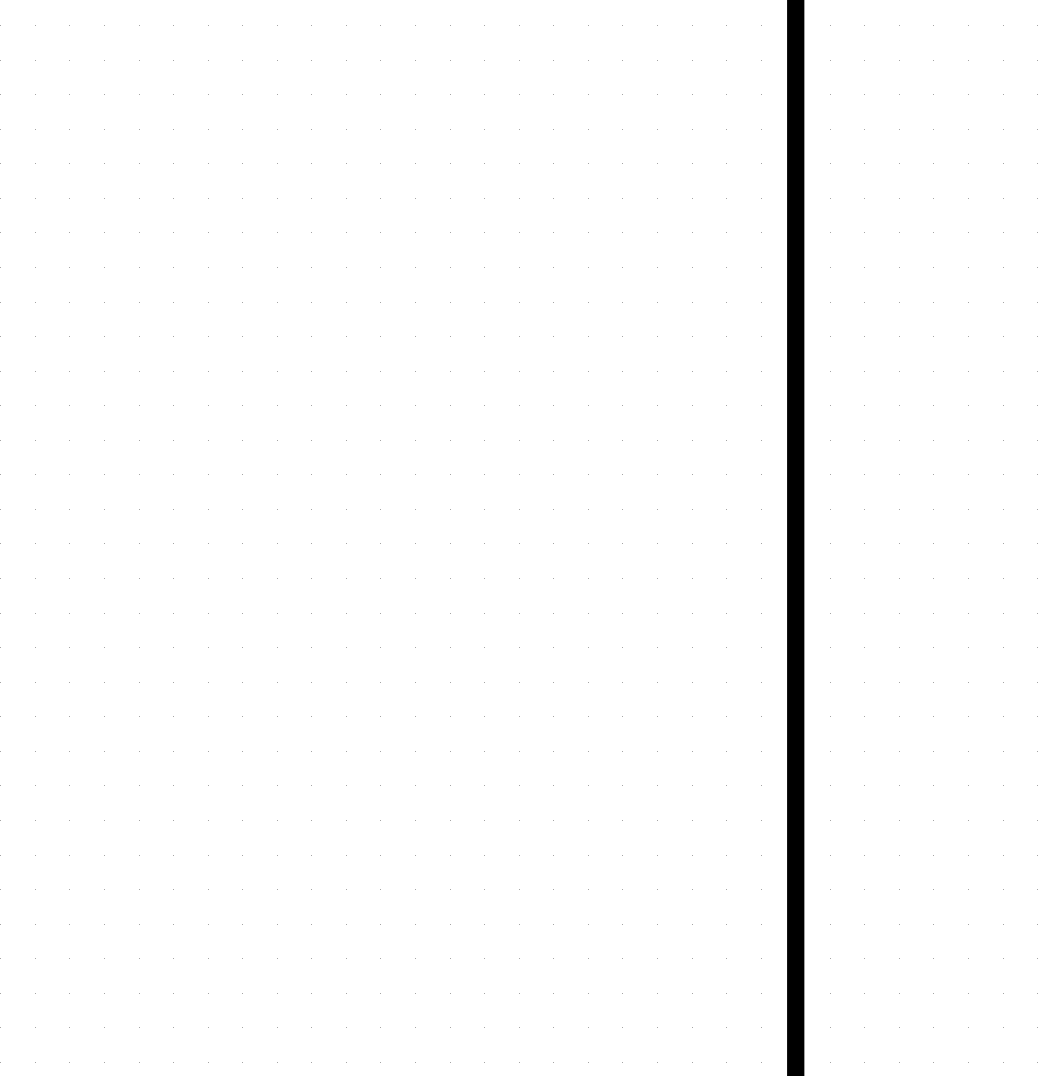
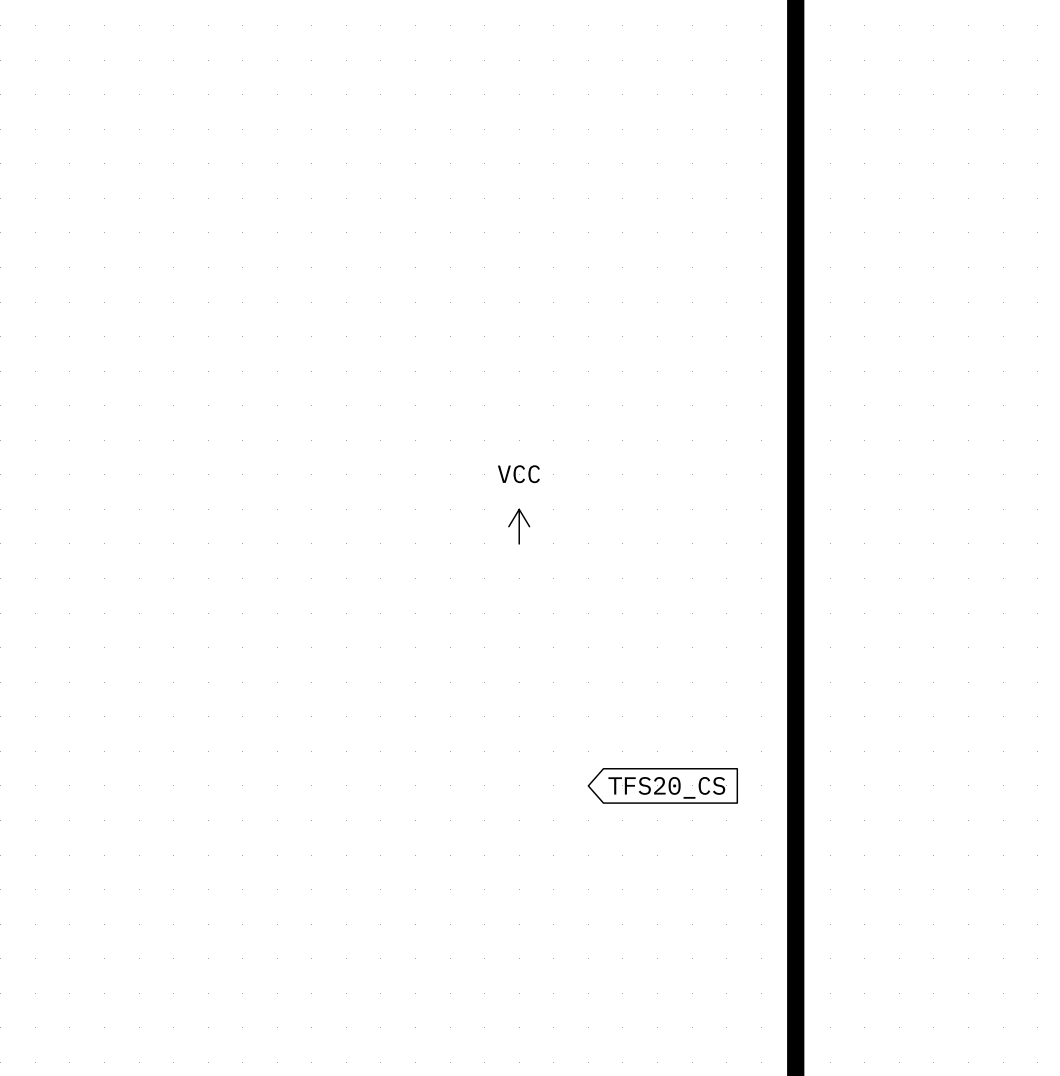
power symbol: none -> VCC (519, 526)
global label: none -> TFS20_CS (666, 787)

